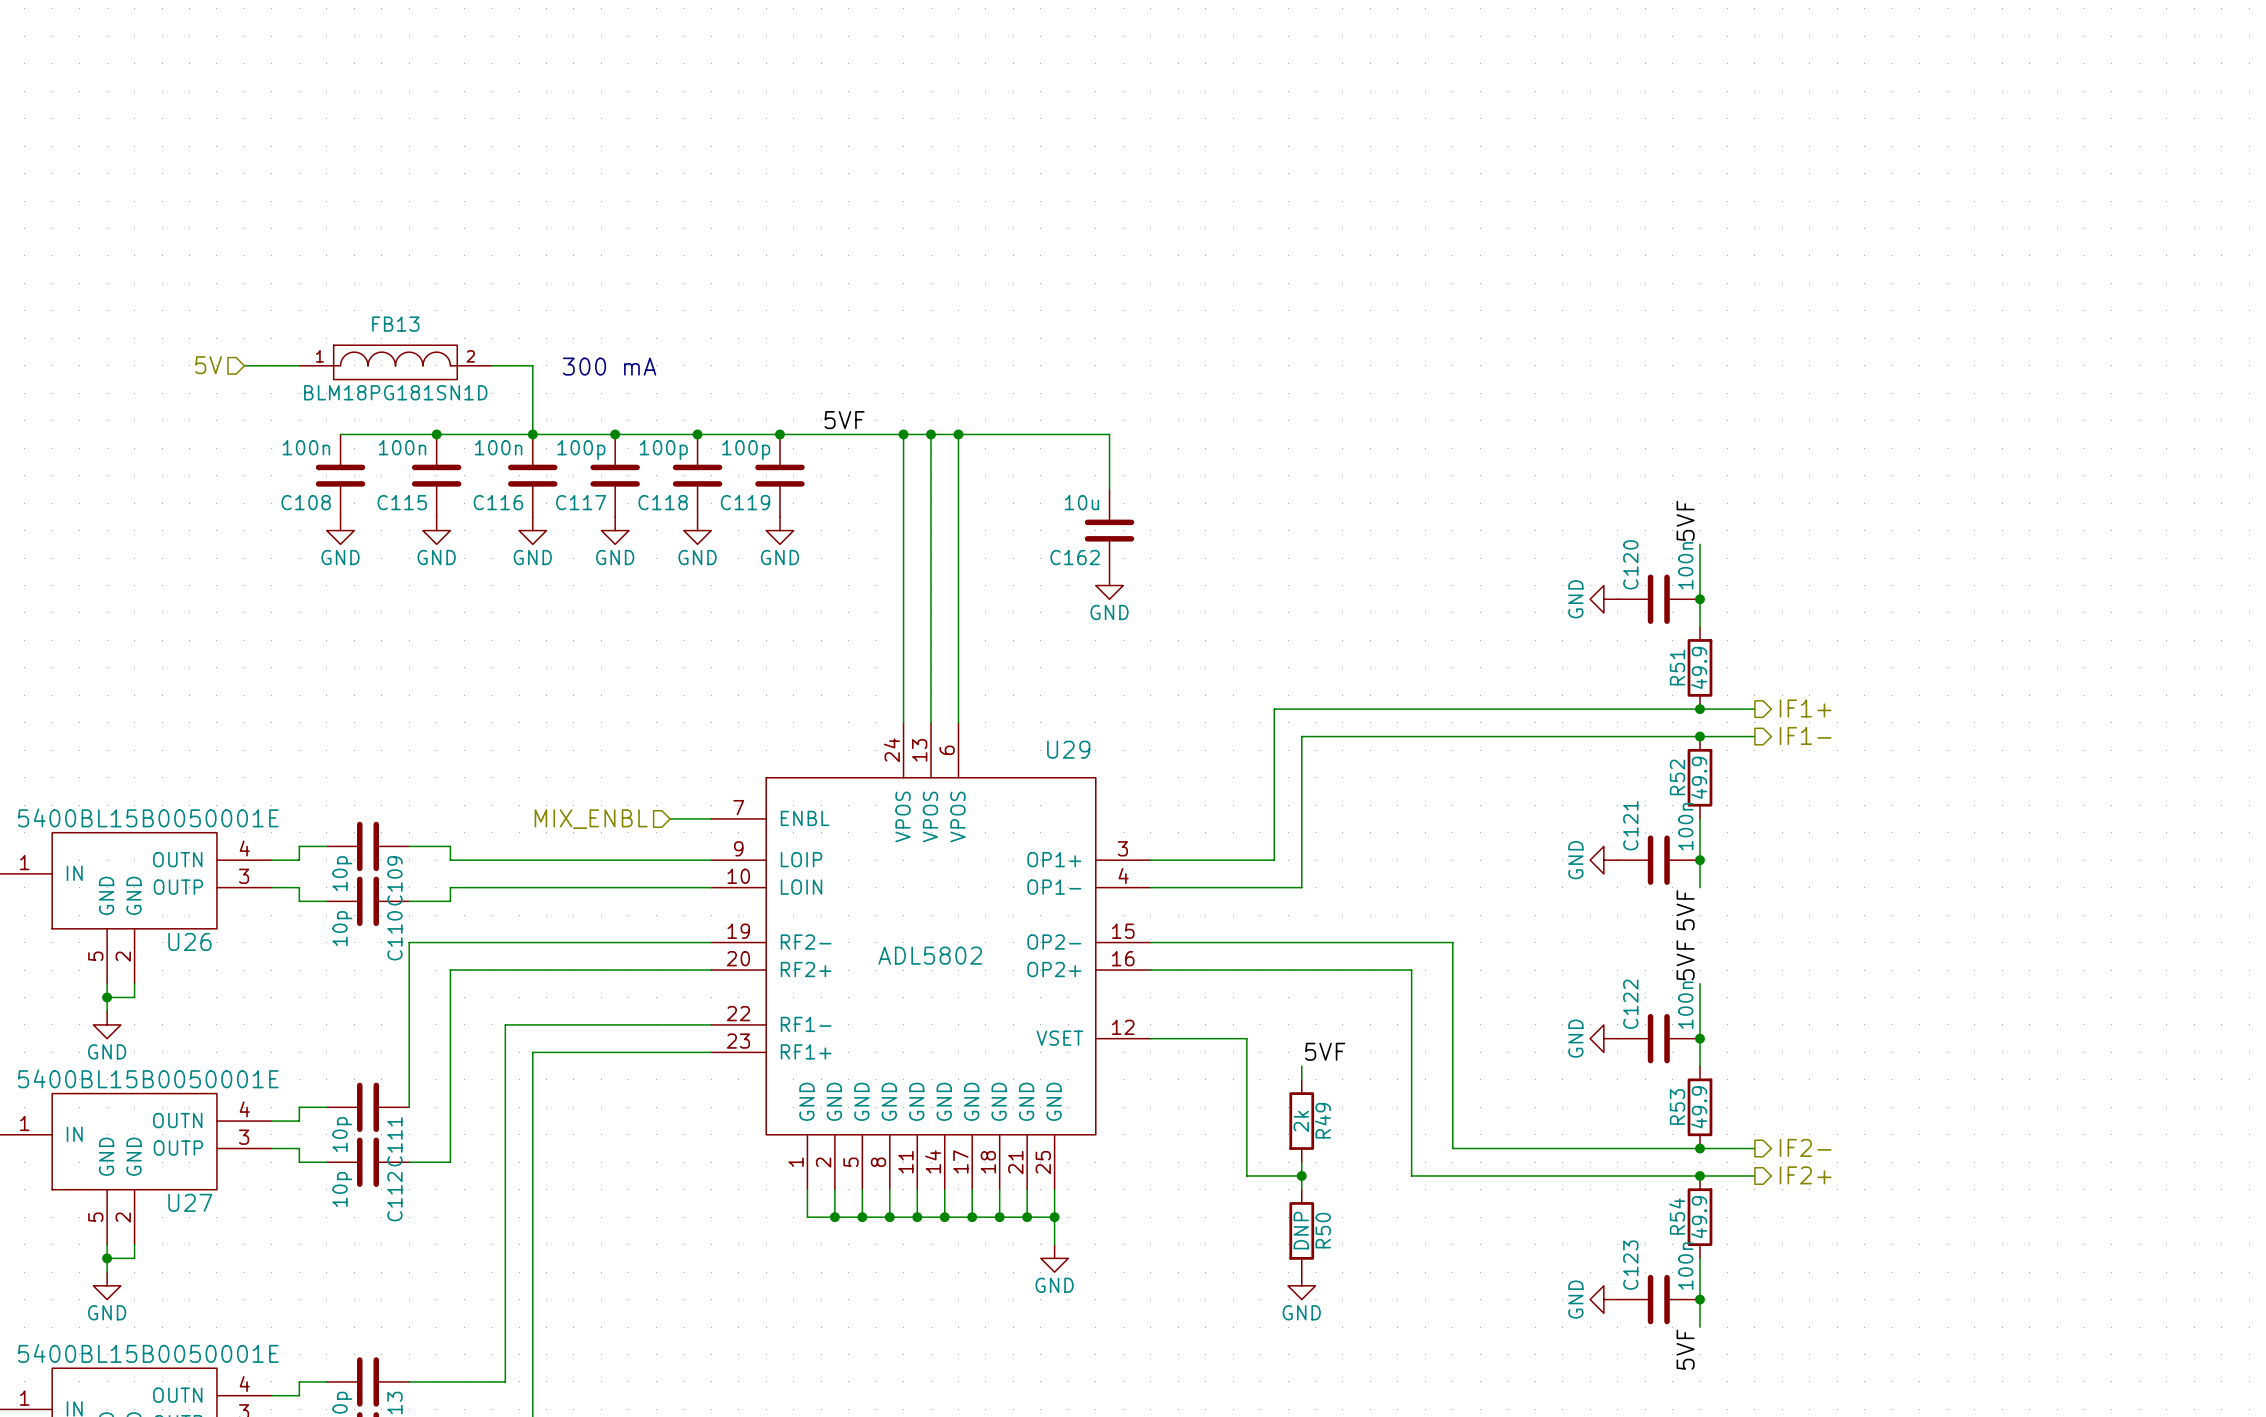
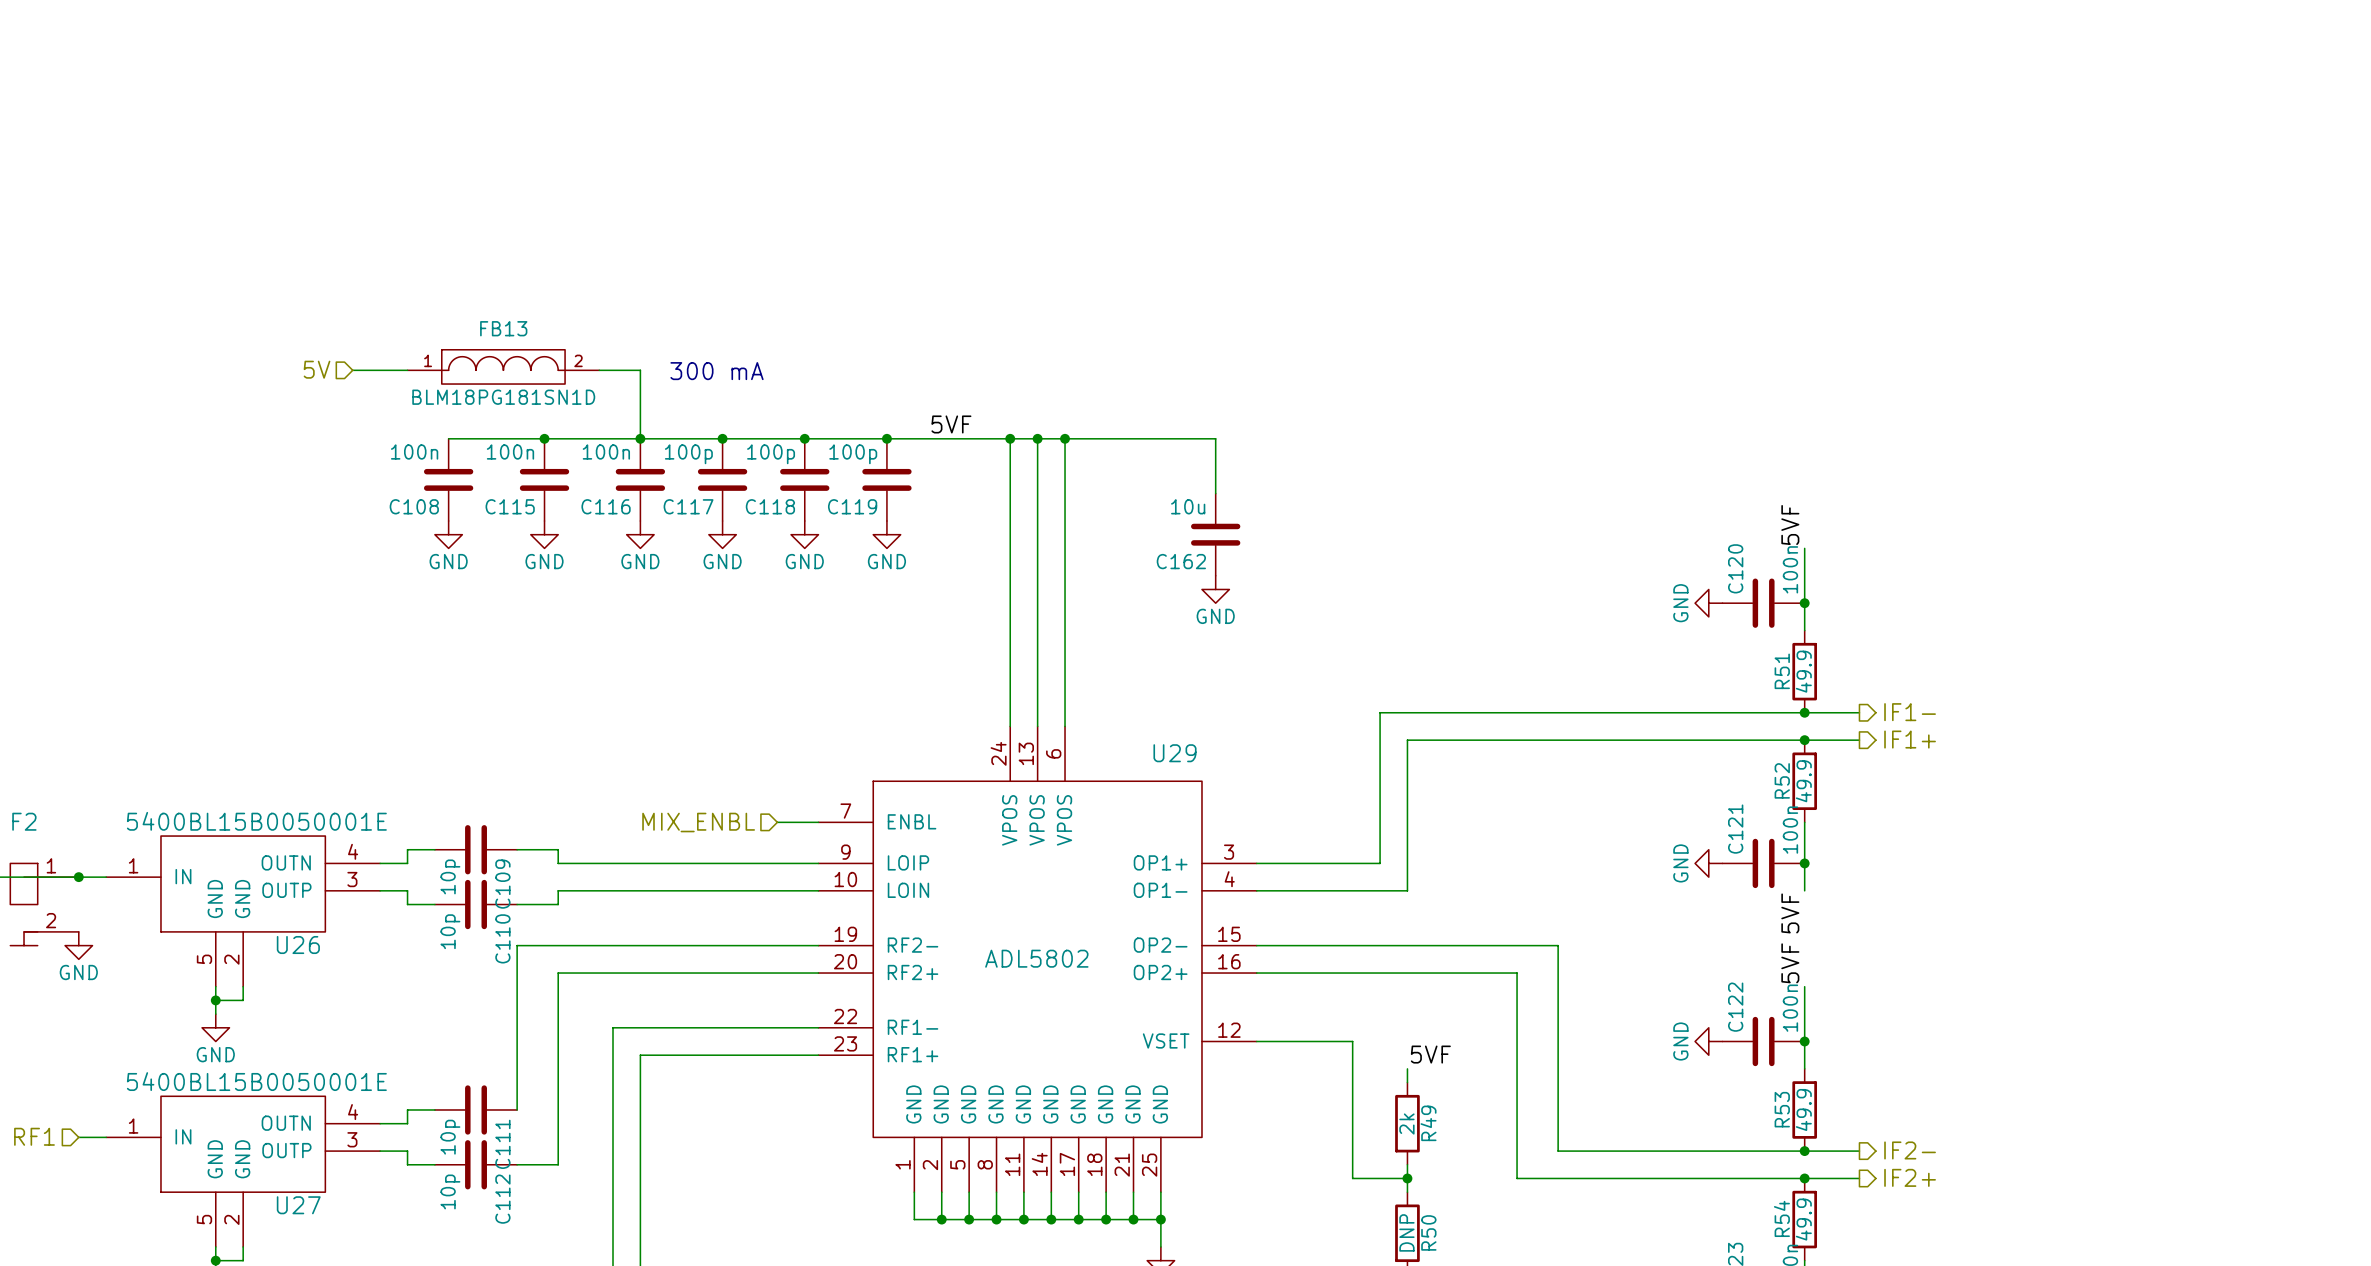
hierarchical label: IF1+ (1805, 708) -> IF1- (1910, 712)
hierarchical label: IF1- (1805, 735) -> IF1+ (1910, 739)

